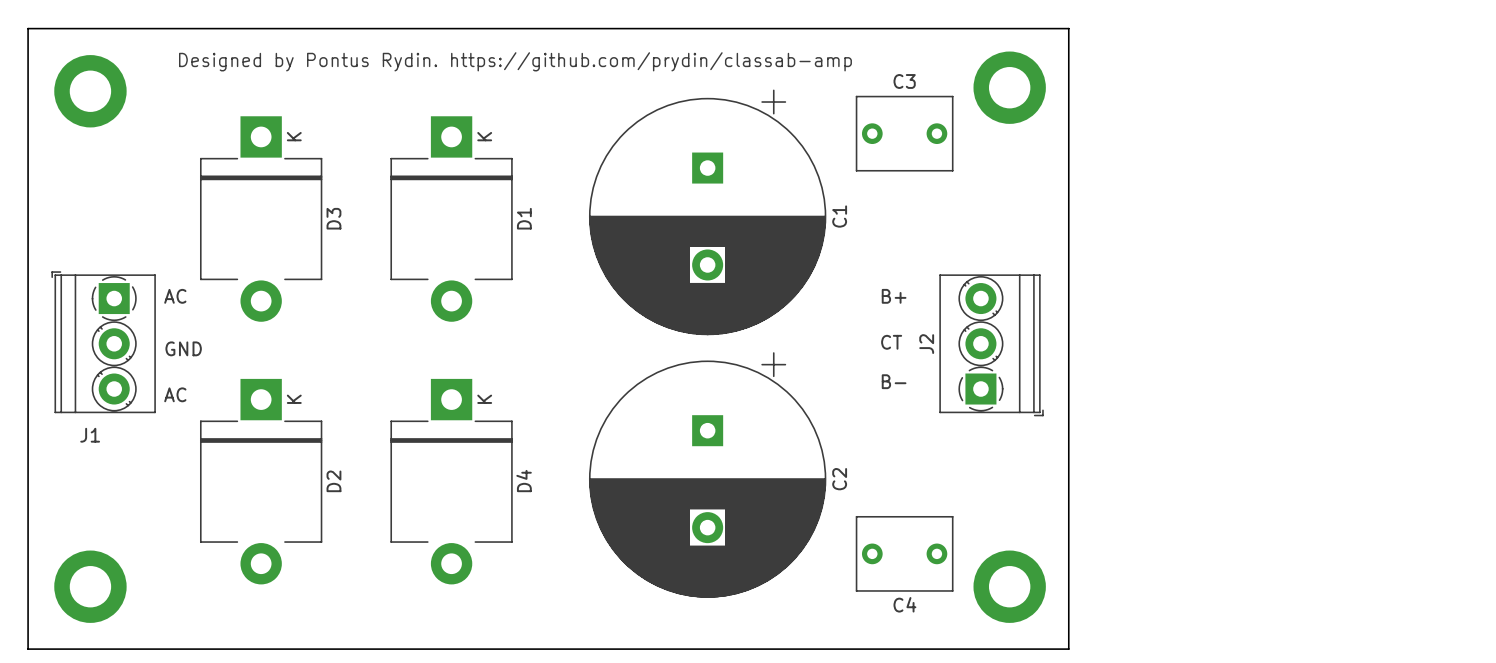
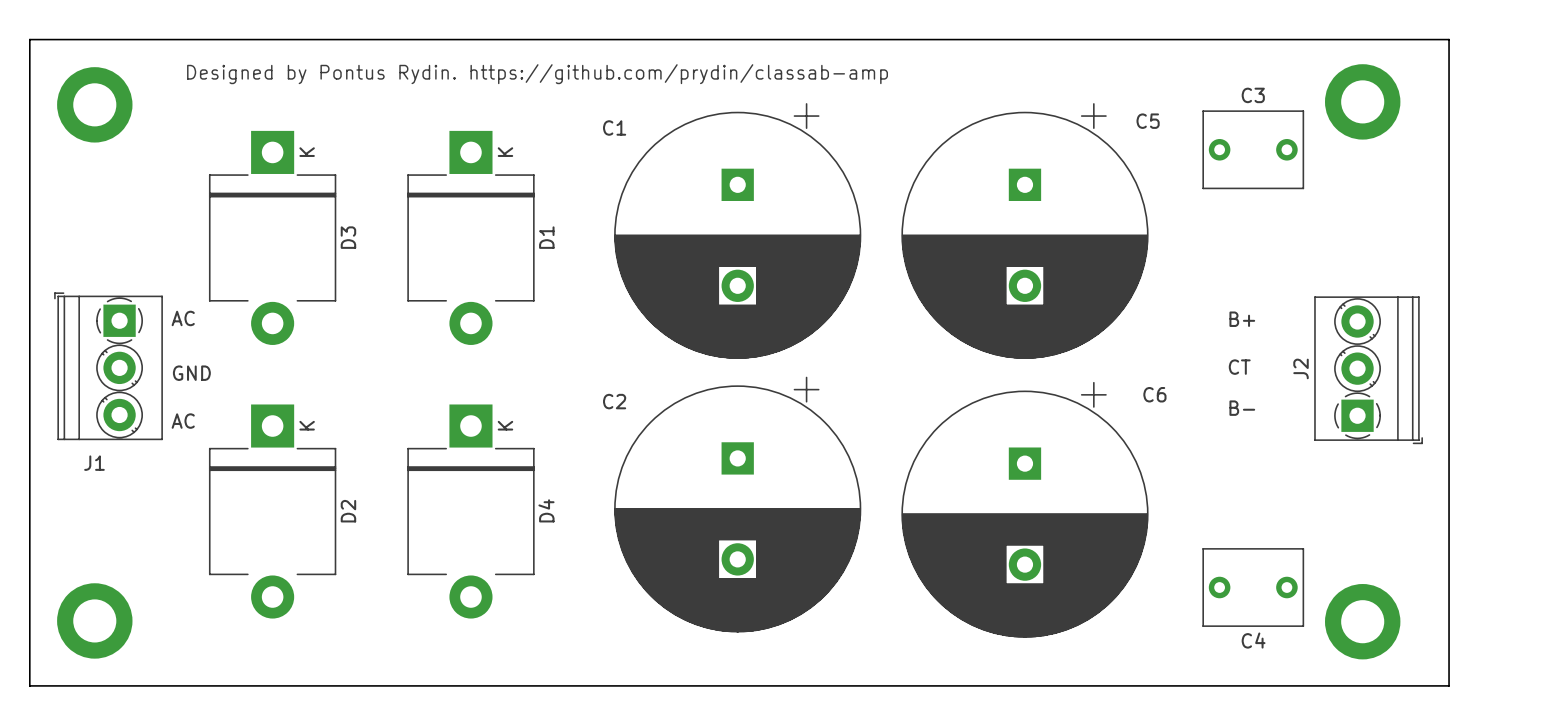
board edge: (1068, 28) (1068, 649) -> (1113, 39) (1449, 39) (1449, 685) (1113, 685)
part: (1009, 87) -> none
part: none -> (1362, 101)
C3 position: (904, 133) -> (1253, 149)
C5: none -> (1024, 231)
C1 name rotation: 0° (839, 216) -> 90° clockwise (614, 127)
C1 name position: C1 (839, 216) -> C1 (614, 127)
text position: B+ (894, 296) -> B+ (1242, 319)
text position: CT (891, 342) -> CT (1239, 367)
J2 position: (991, 345) -> (1368, 370)
text position: B- (894, 381) -> B- (1242, 408)
C2 name rotation: 0° (839, 479) -> 90° clockwise (614, 401)
C2 name position: C2 (839, 479) -> C2 (614, 401)
C6: none -> (1024, 509)
C4 position: (904, 553) -> (1253, 587)
part: (1009, 586) -> none
part: none -> (1362, 621)

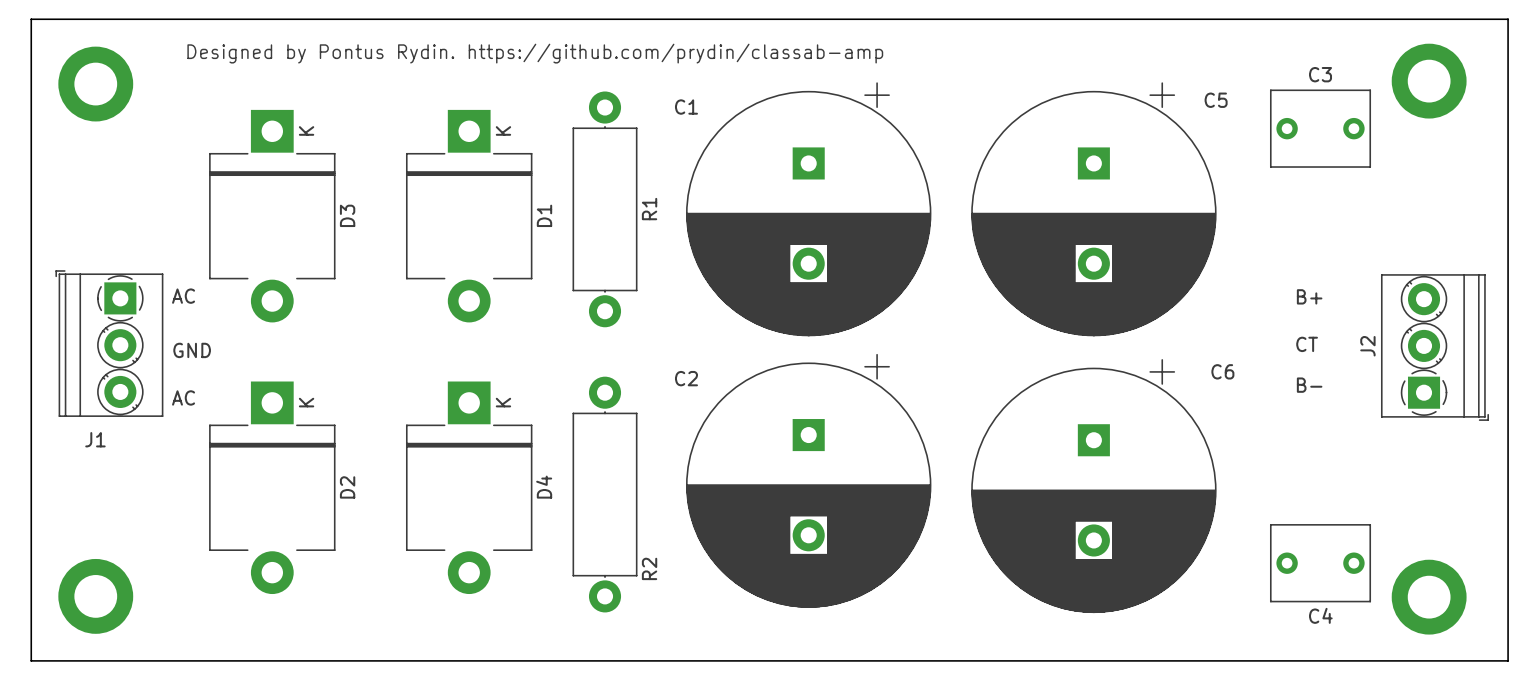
board edge: (1449, 39) (1449, 685) -> (1440, 19) (1508, 19) (1508, 660) (1440, 660)
part position: (1362, 101) -> (1429, 81)
C3 position: (1253, 149) -> (1320, 128)
R1: none -> (605, 209)
C1 position: (737, 231) -> (808, 209)
C5 position: (1024, 231) -> (1093, 209)
text position: B+ (1242, 319) -> B+ (1309, 296)
text position: CT (1239, 367) -> CT (1307, 344)
J2 position: (1368, 370) -> (1434, 347)
text position: B- (1242, 408) -> B- (1309, 385)
C2 position: (737, 504) -> (808, 480)
C6 position: (1024, 509) -> (1093, 486)
R2: none -> (605, 494)
C4 position: (1253, 587) -> (1320, 563)
part position: (1362, 621) -> (1429, 597)

